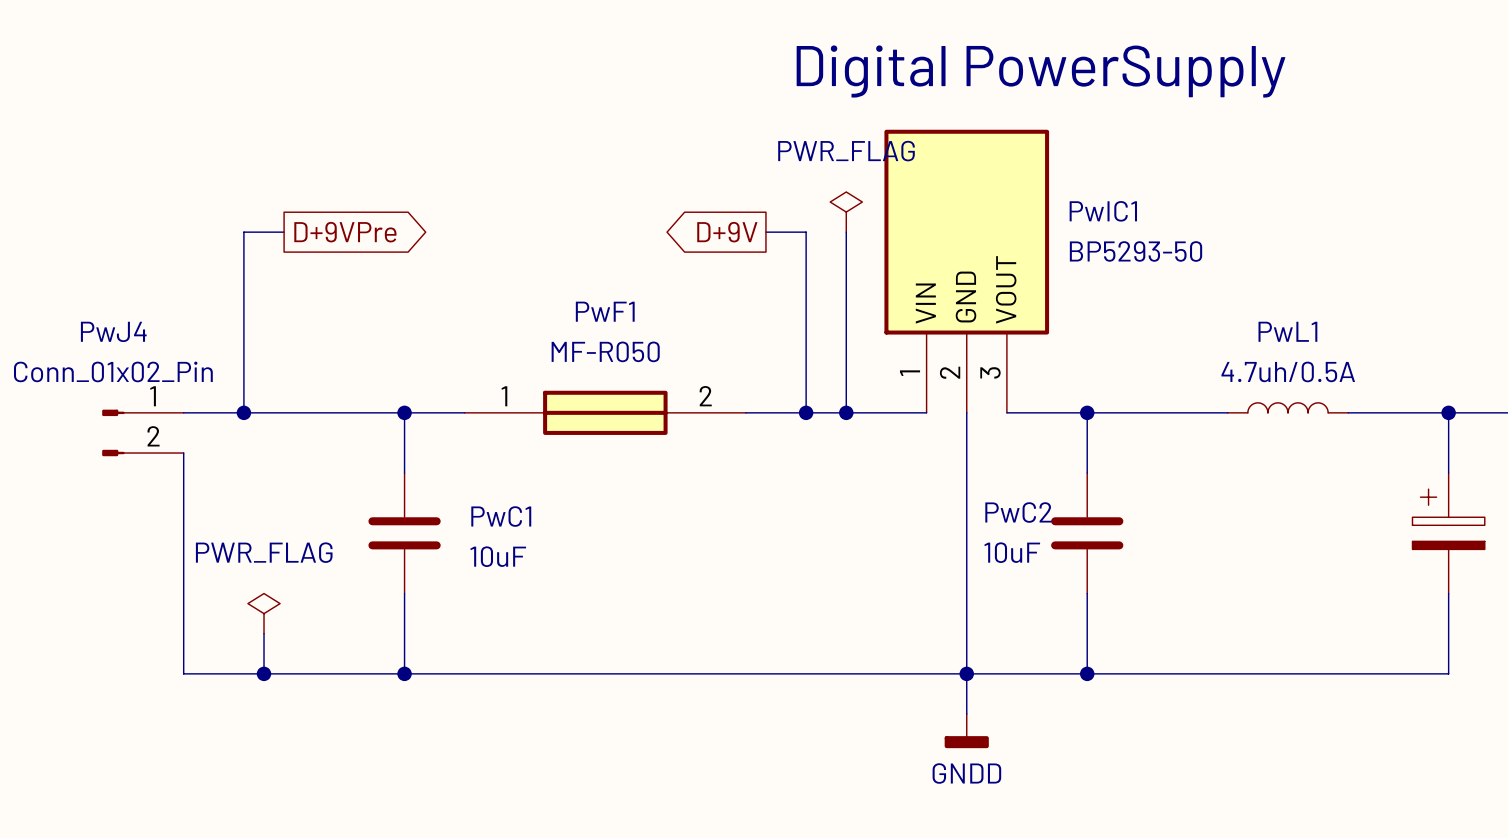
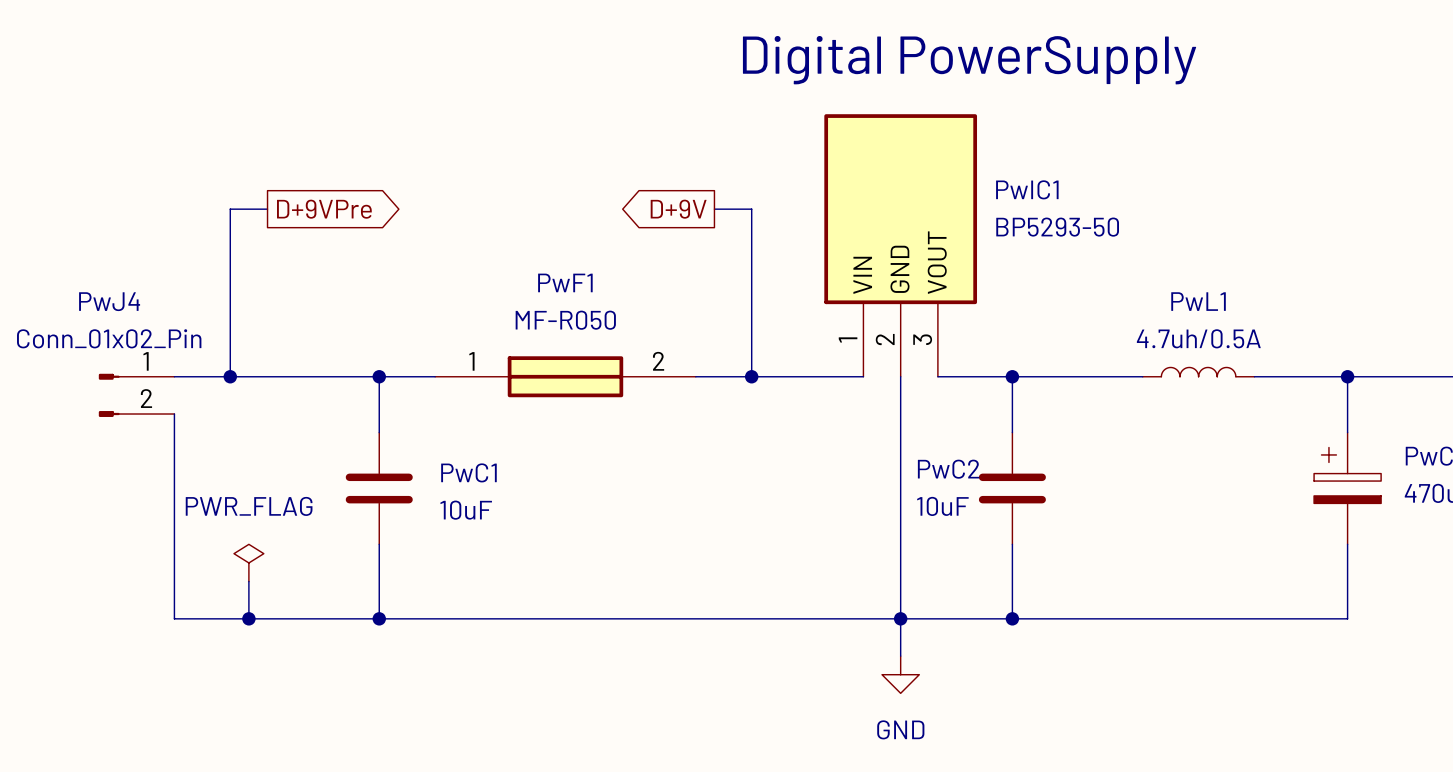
power symbol: PWR_FLAG (846, 212) -> none
wire: (846, 232) (846, 412) -> none
junction: (846, 412) -> none
power symbol: GNDD (966, 731) -> GND (900, 674)

